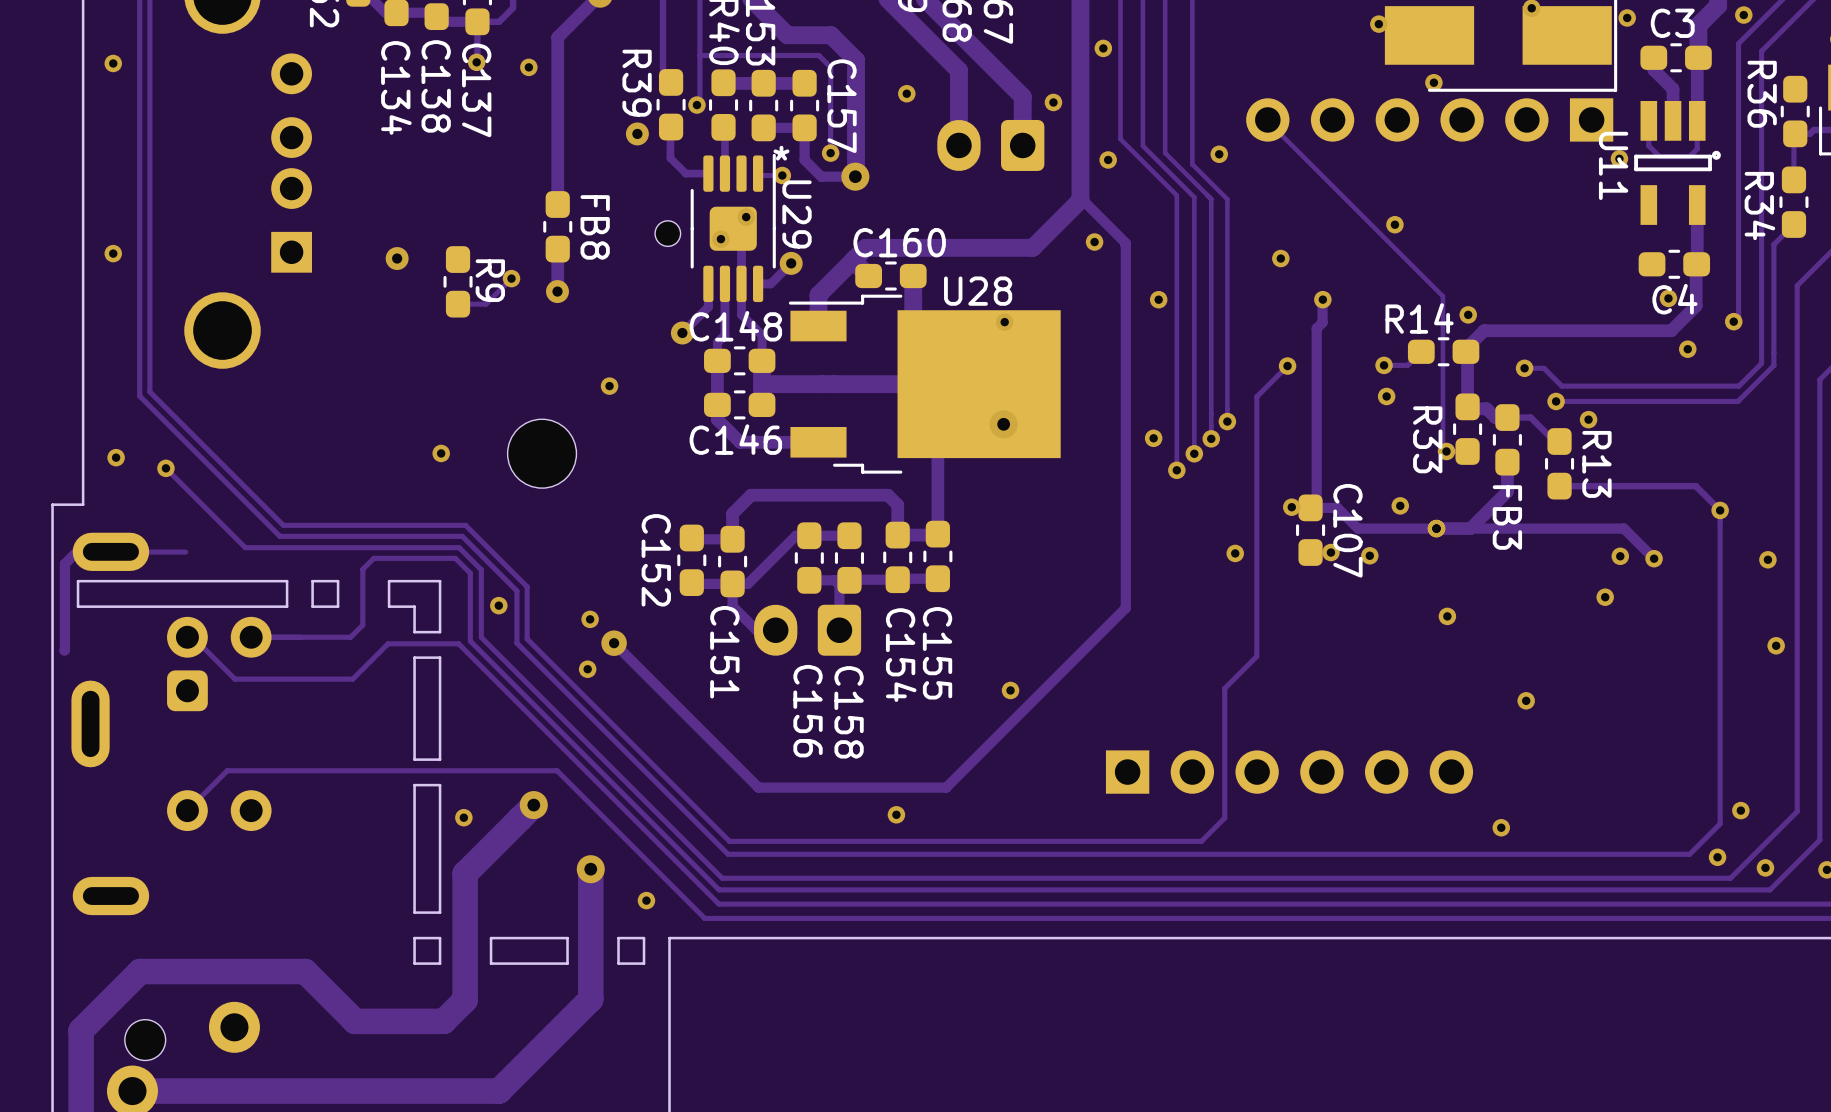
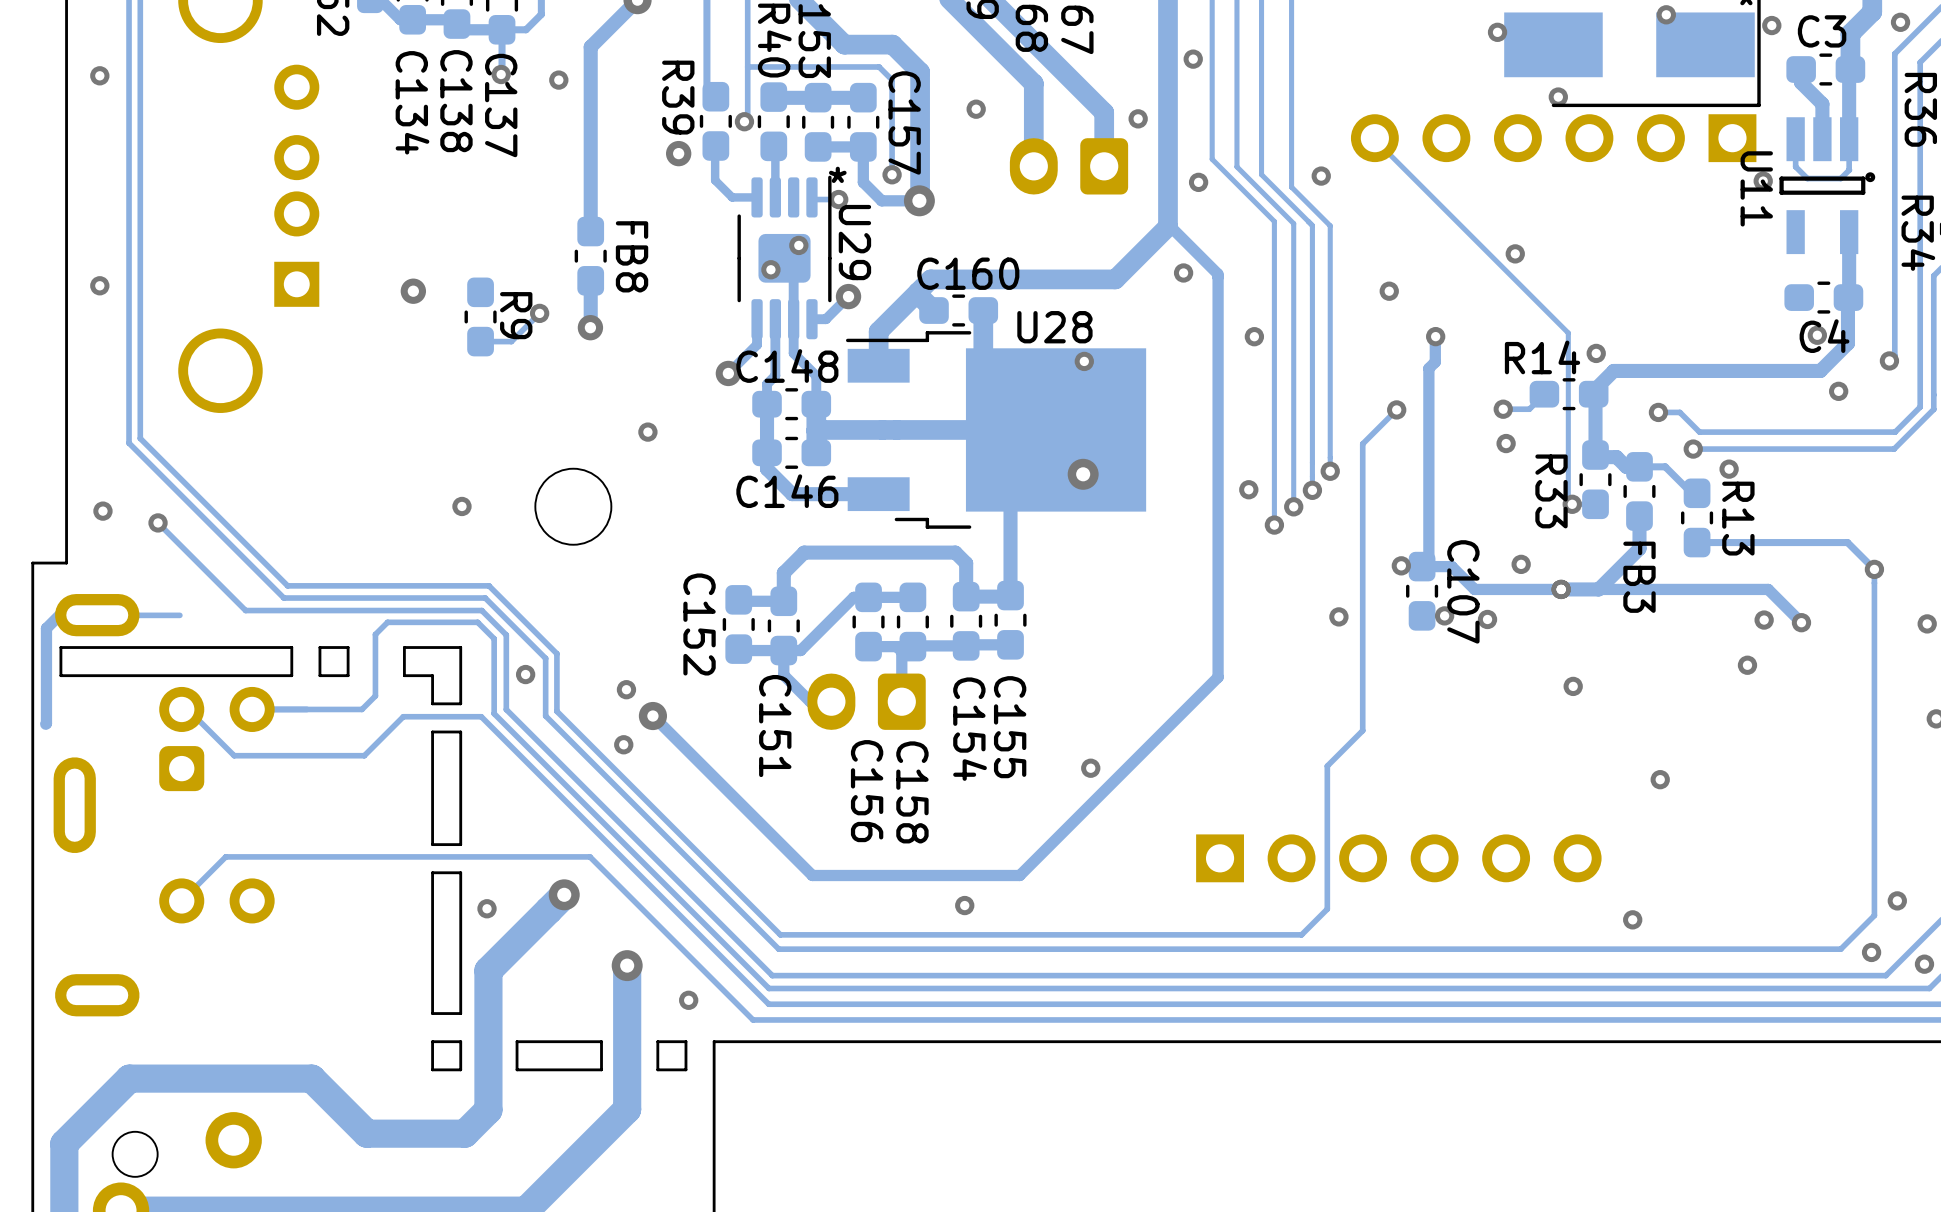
part: (667, 233) -> none

